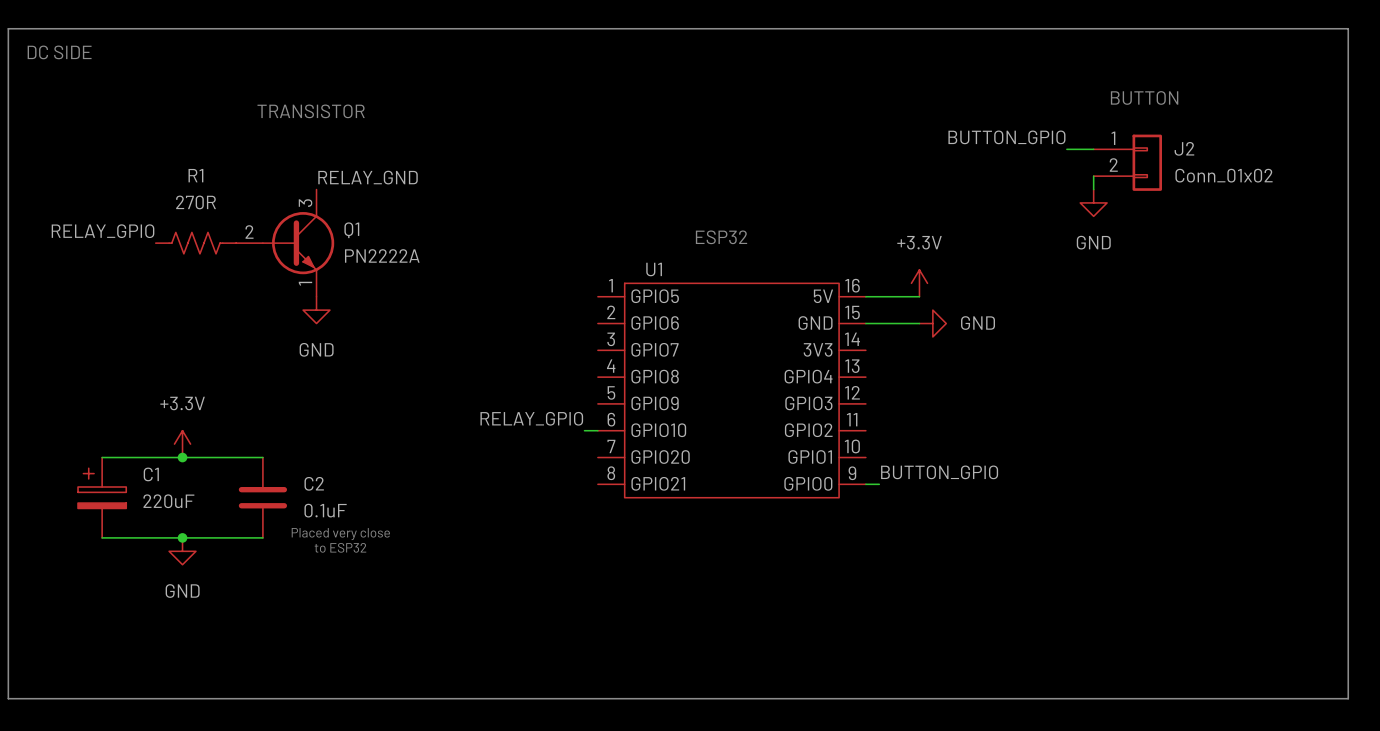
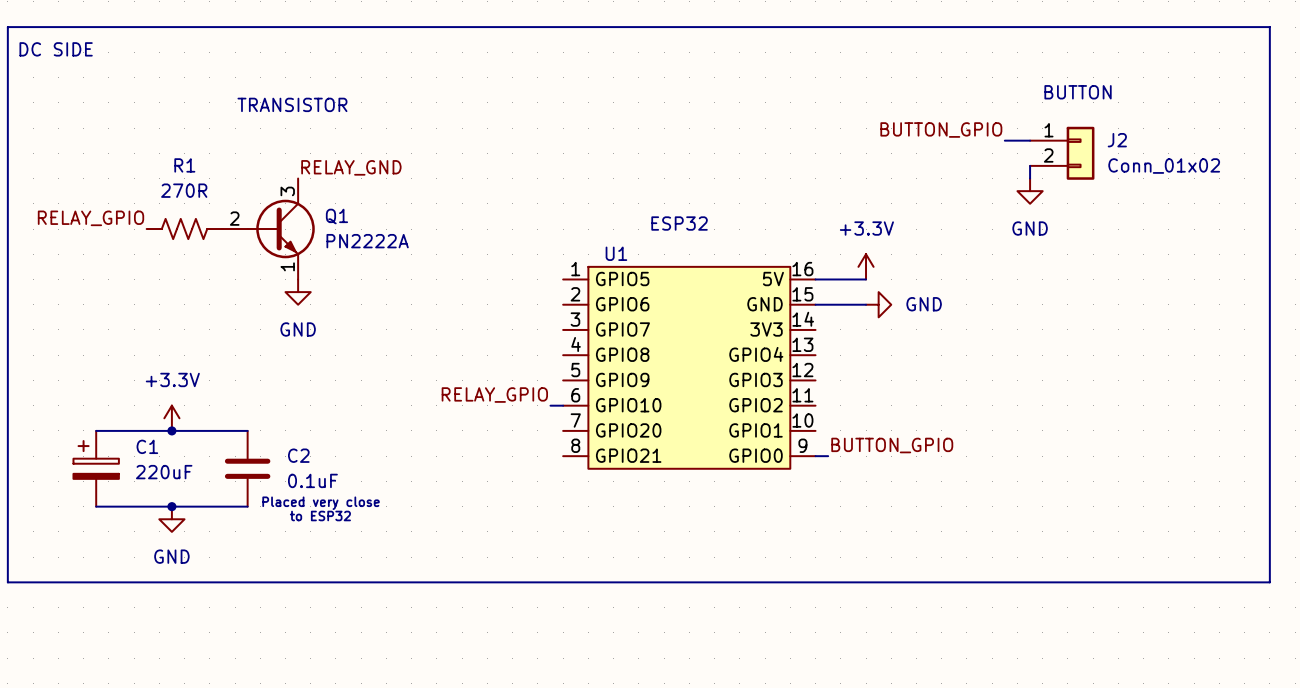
line: (8, 618) (8, 698) (1348, 698) (1348, 618) -> (7, 582) (1269, 582)

